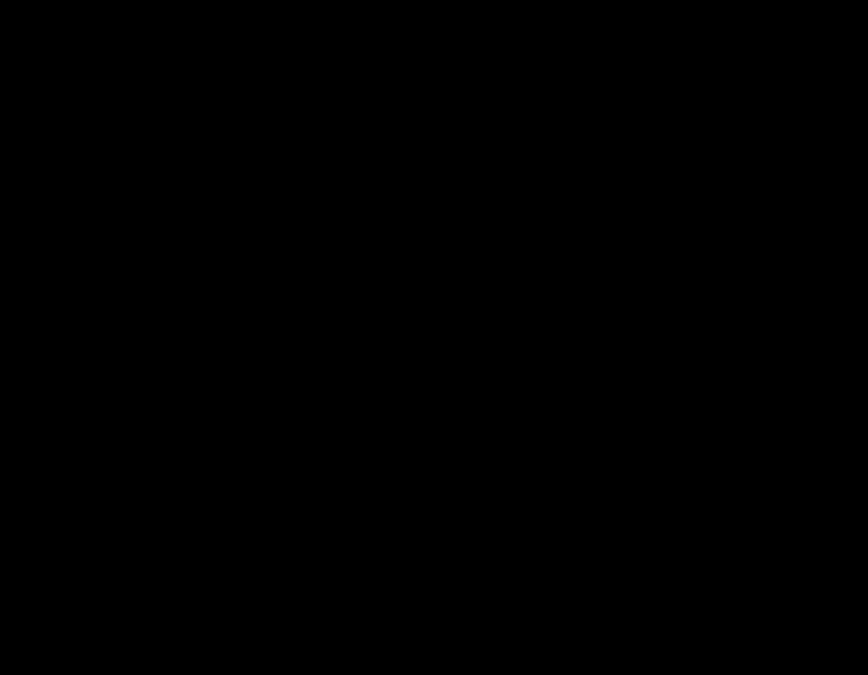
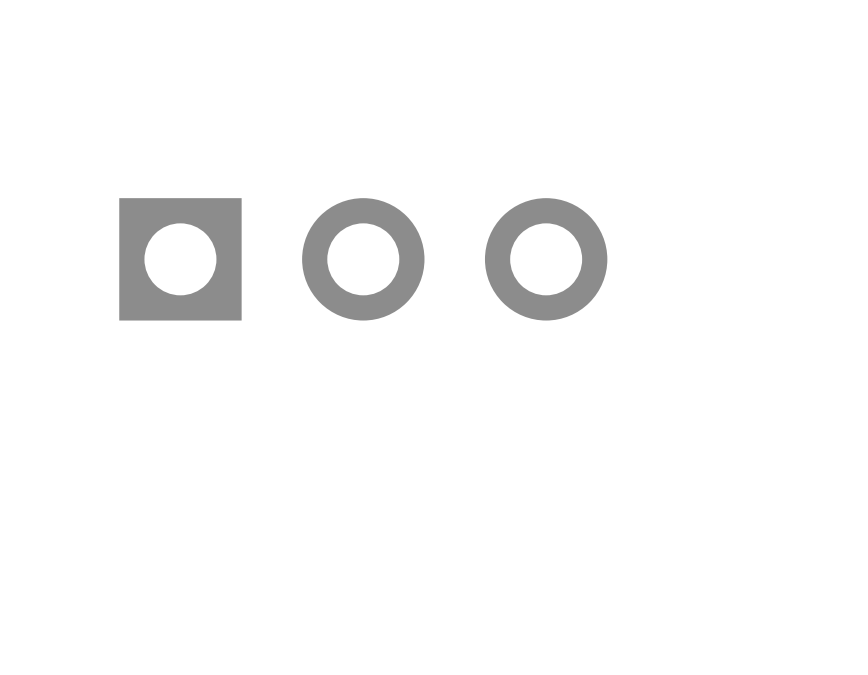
part: none -> (363, 259)

